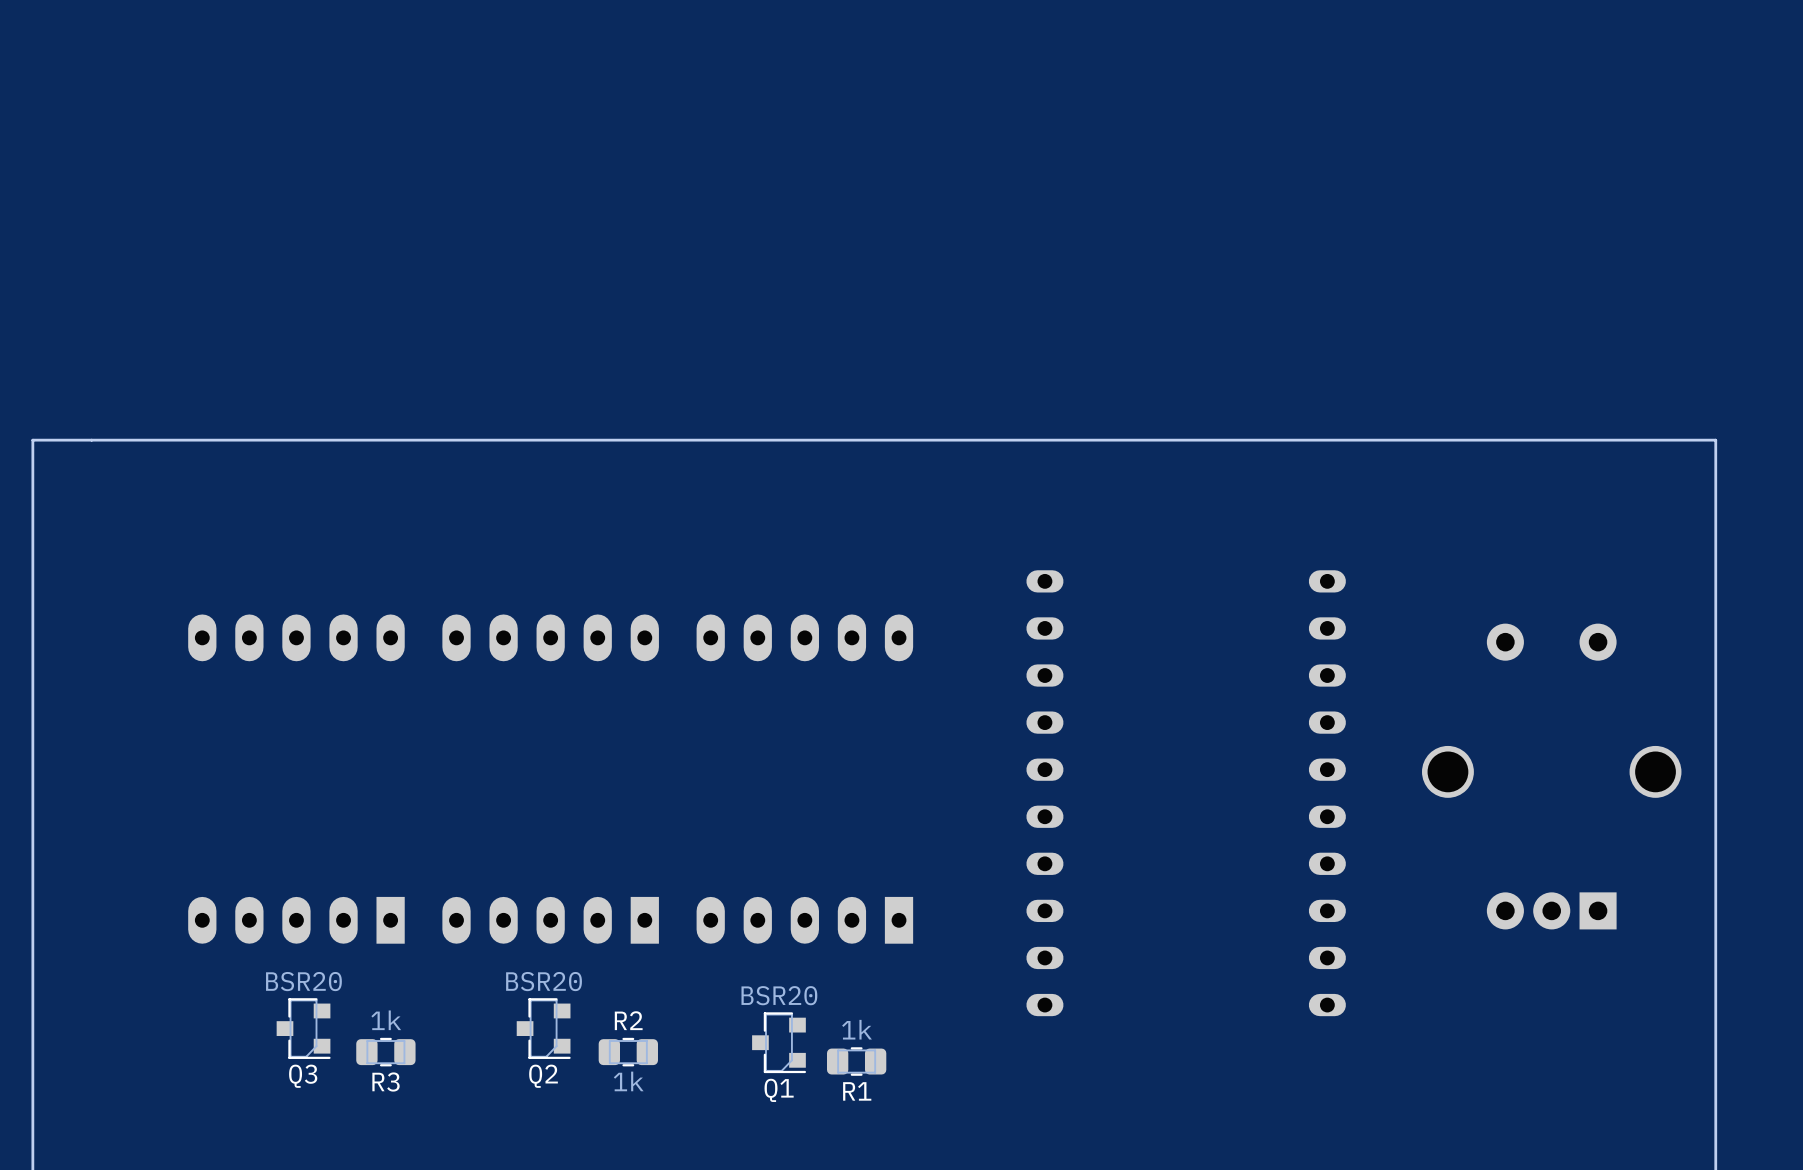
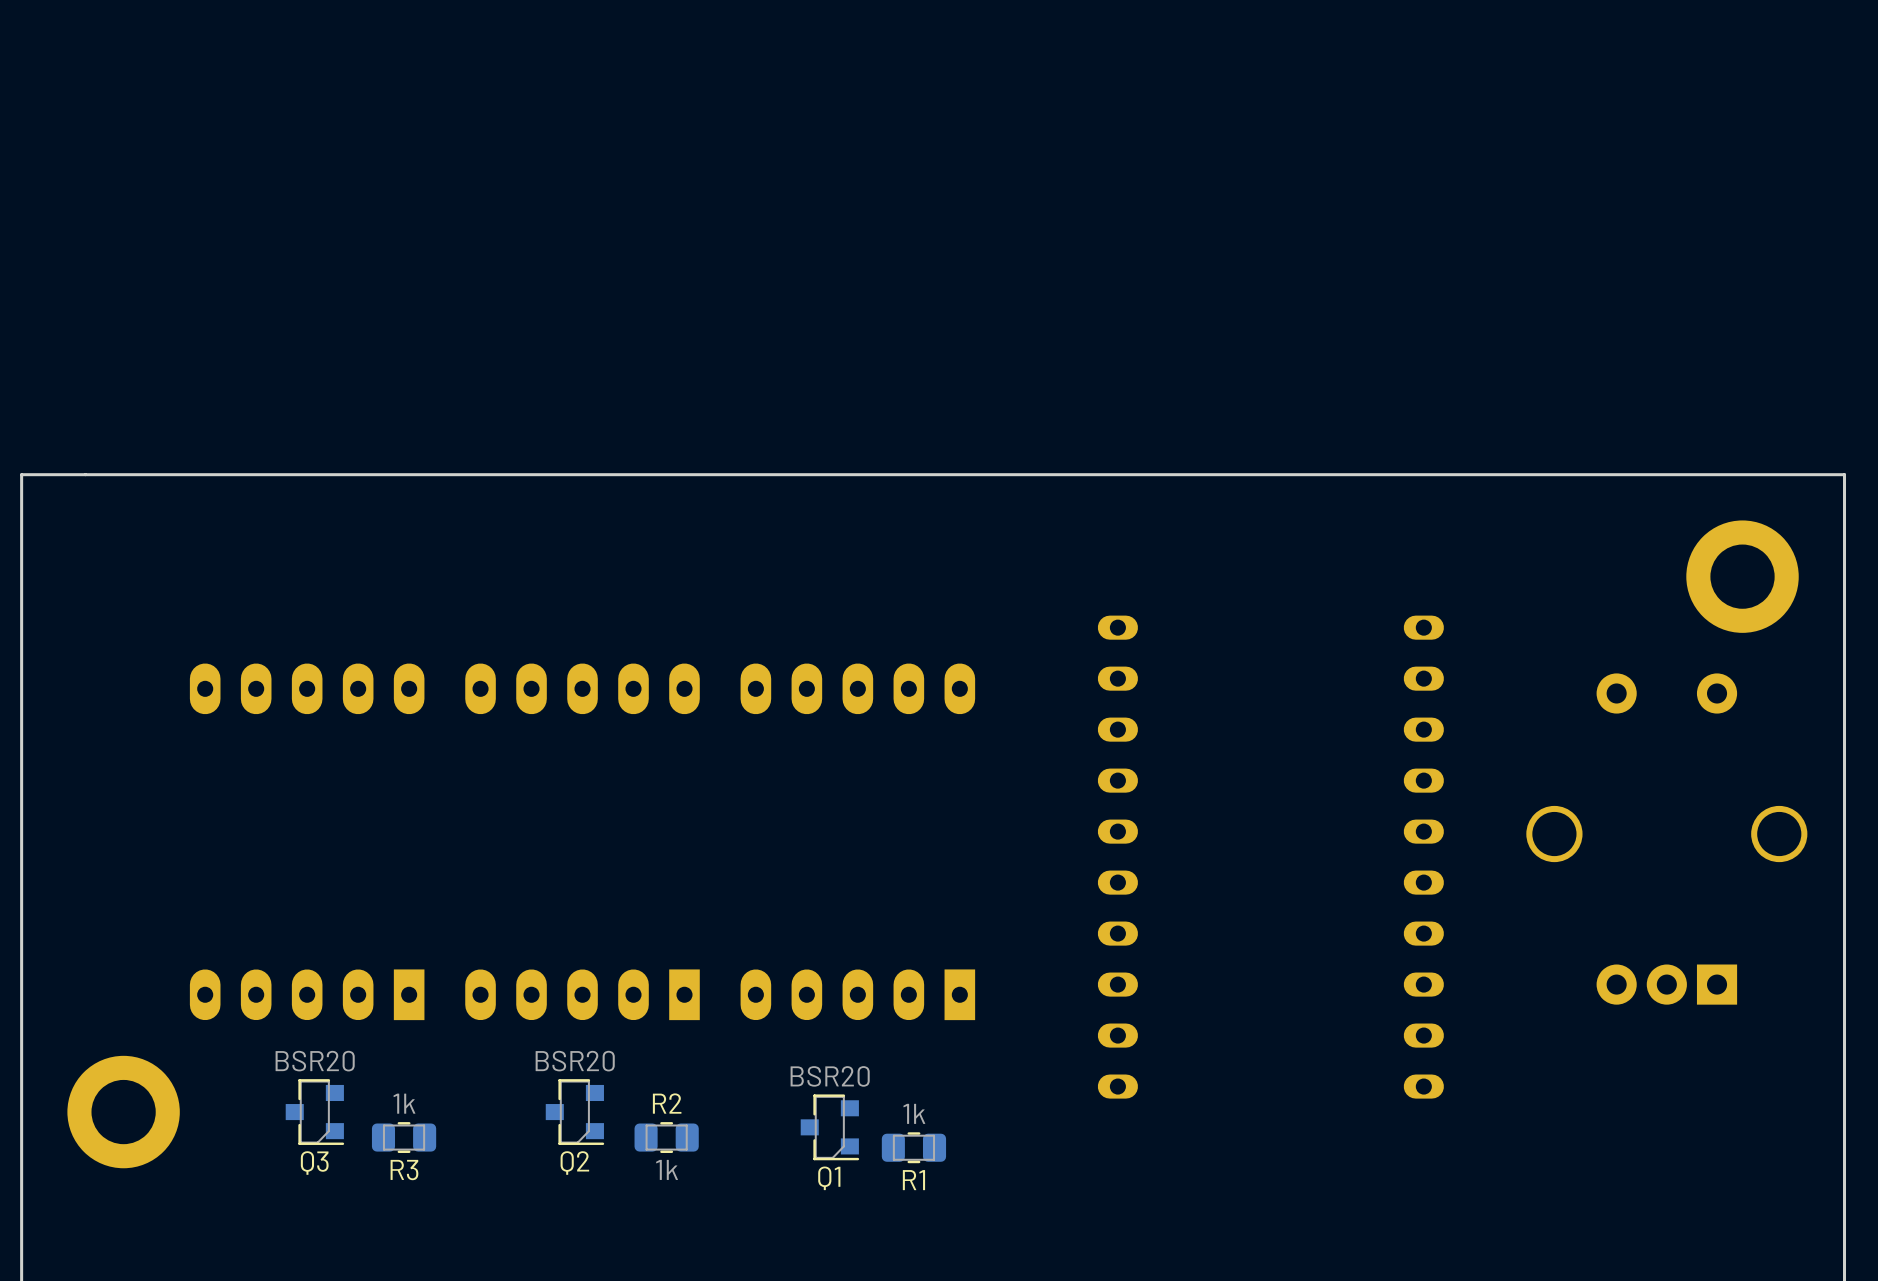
part: none -> (1742, 576)
part: none -> (123, 1112)

